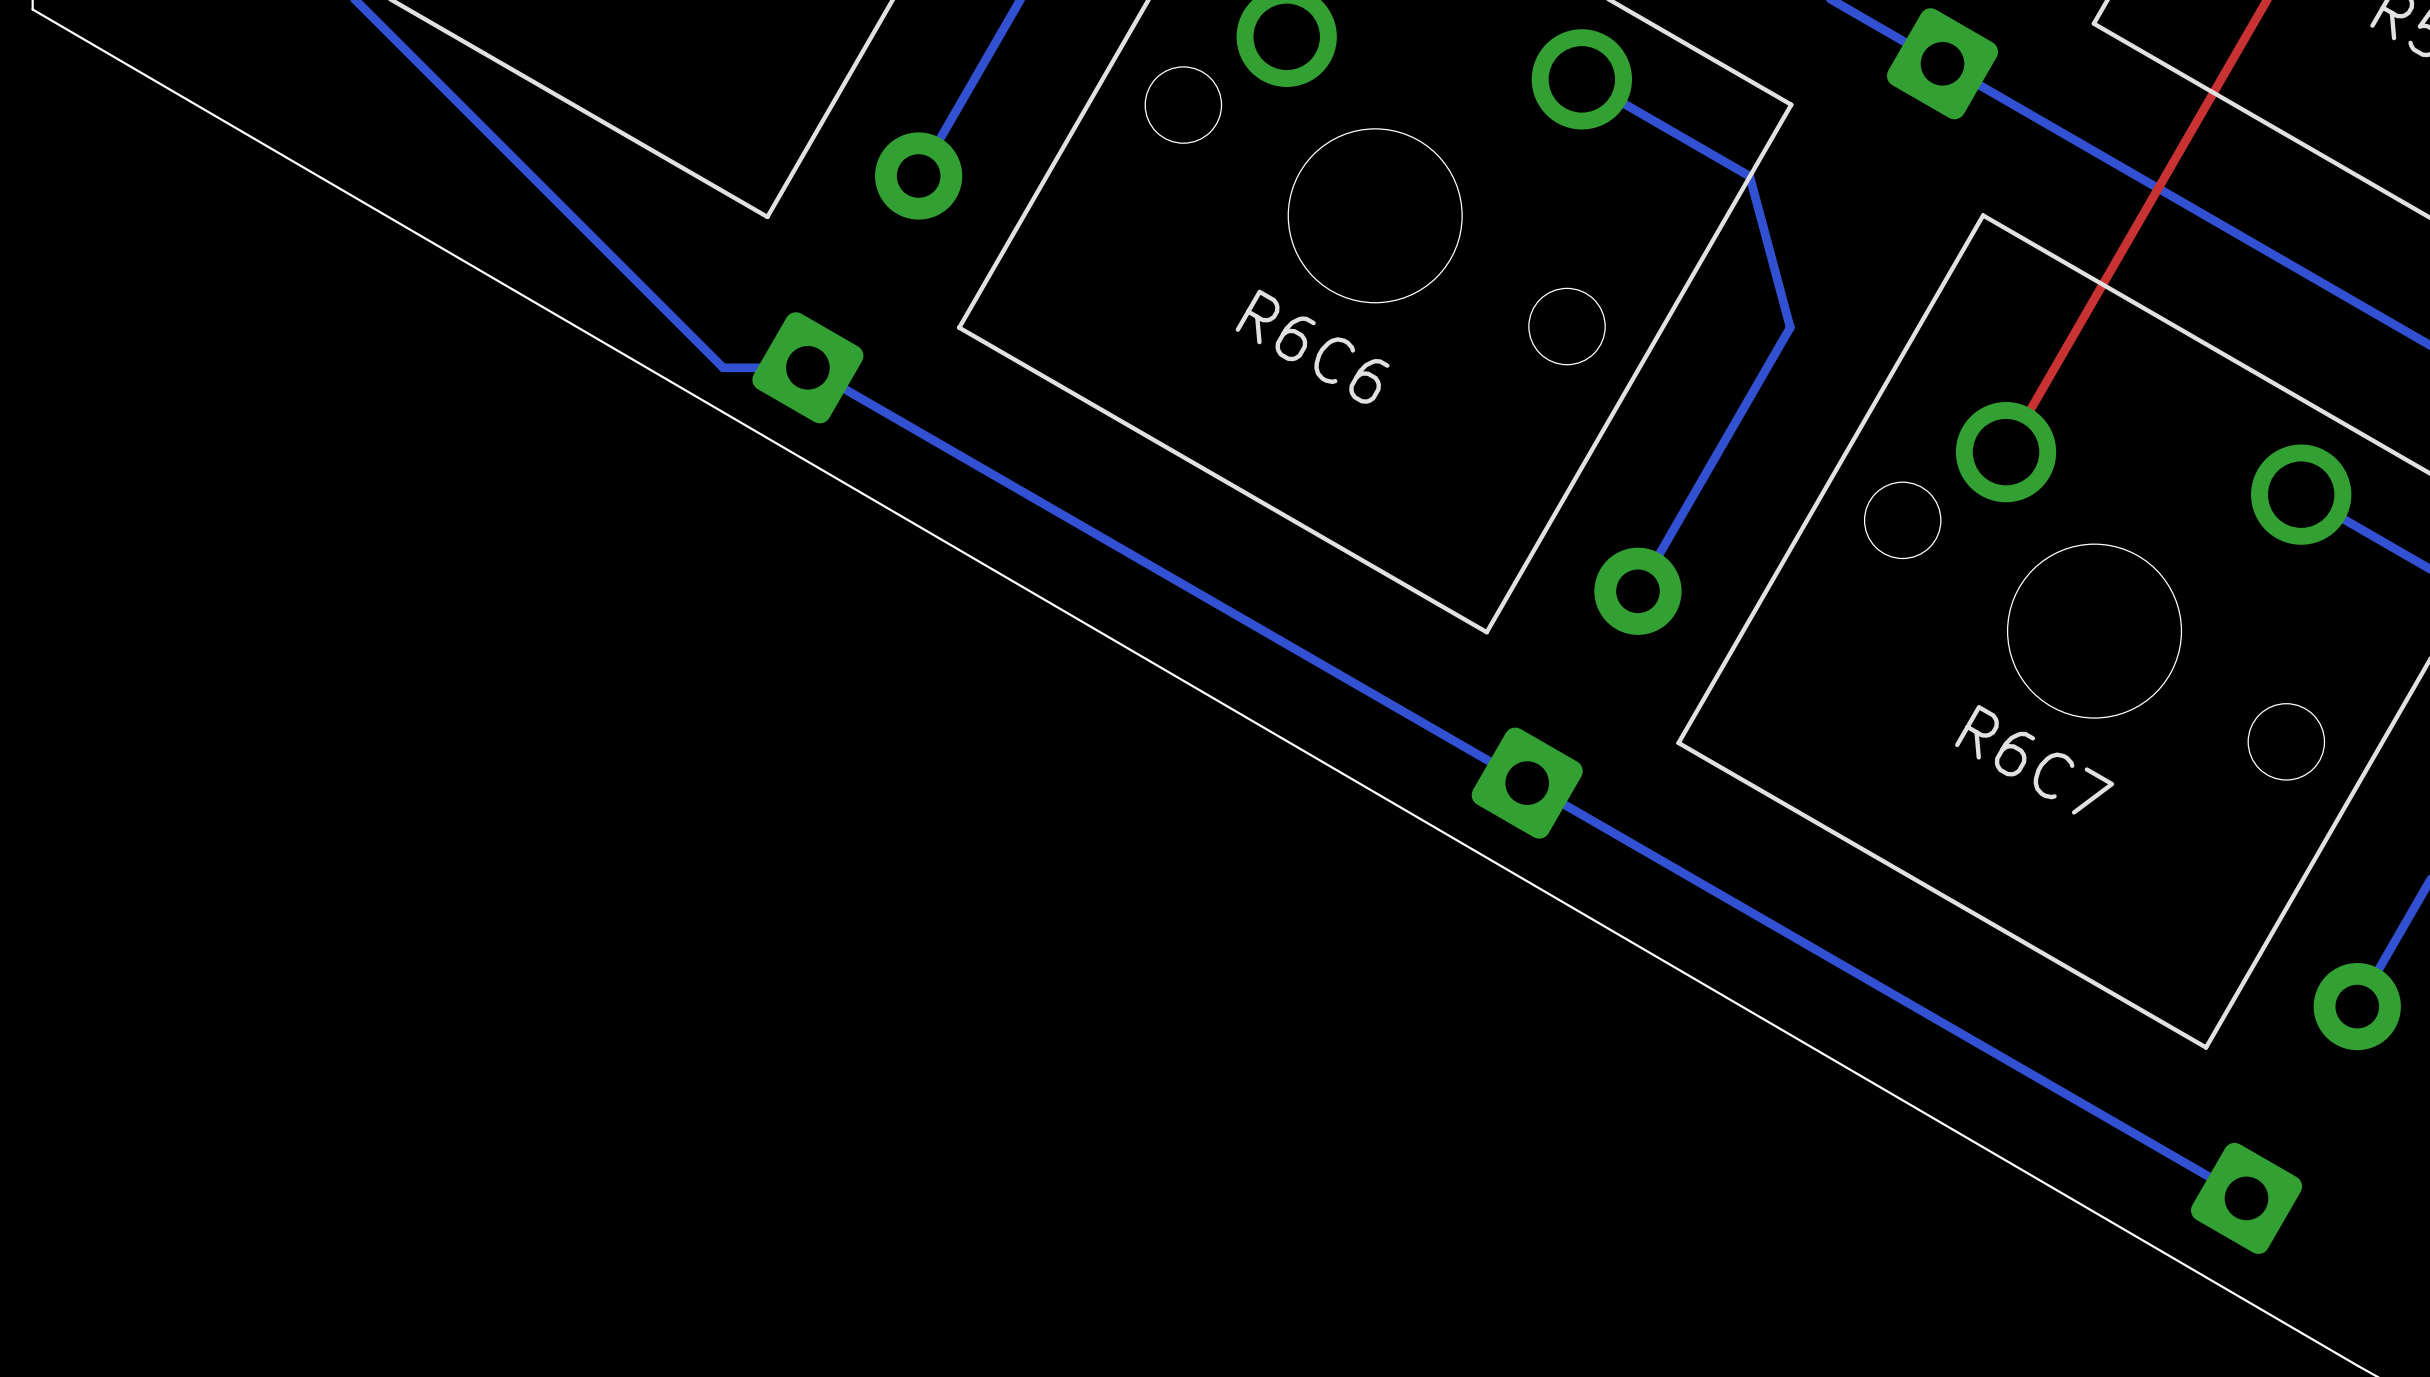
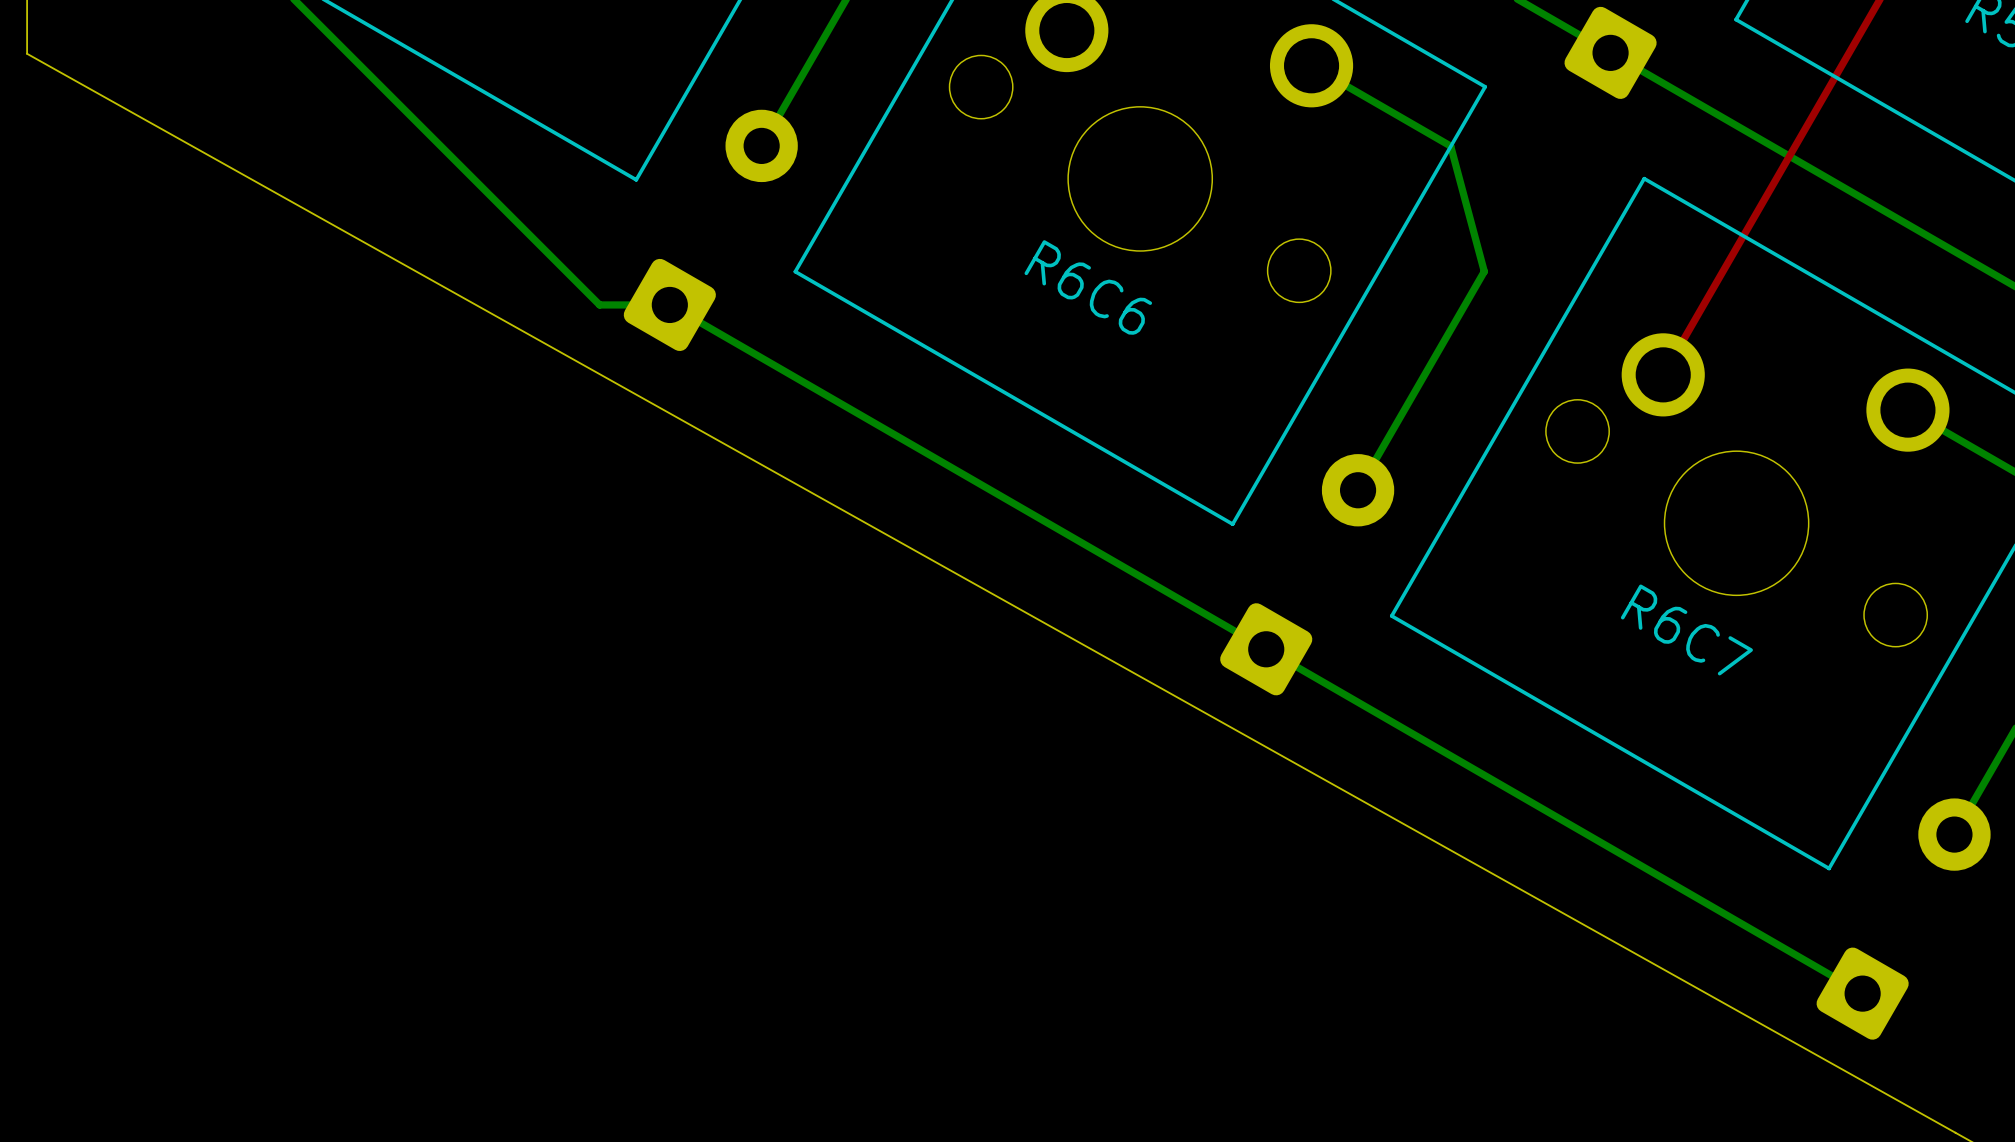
board edge: (32, 9) (2358, 1366) -> (27, 7) (27, 53) (1955, 1132)

